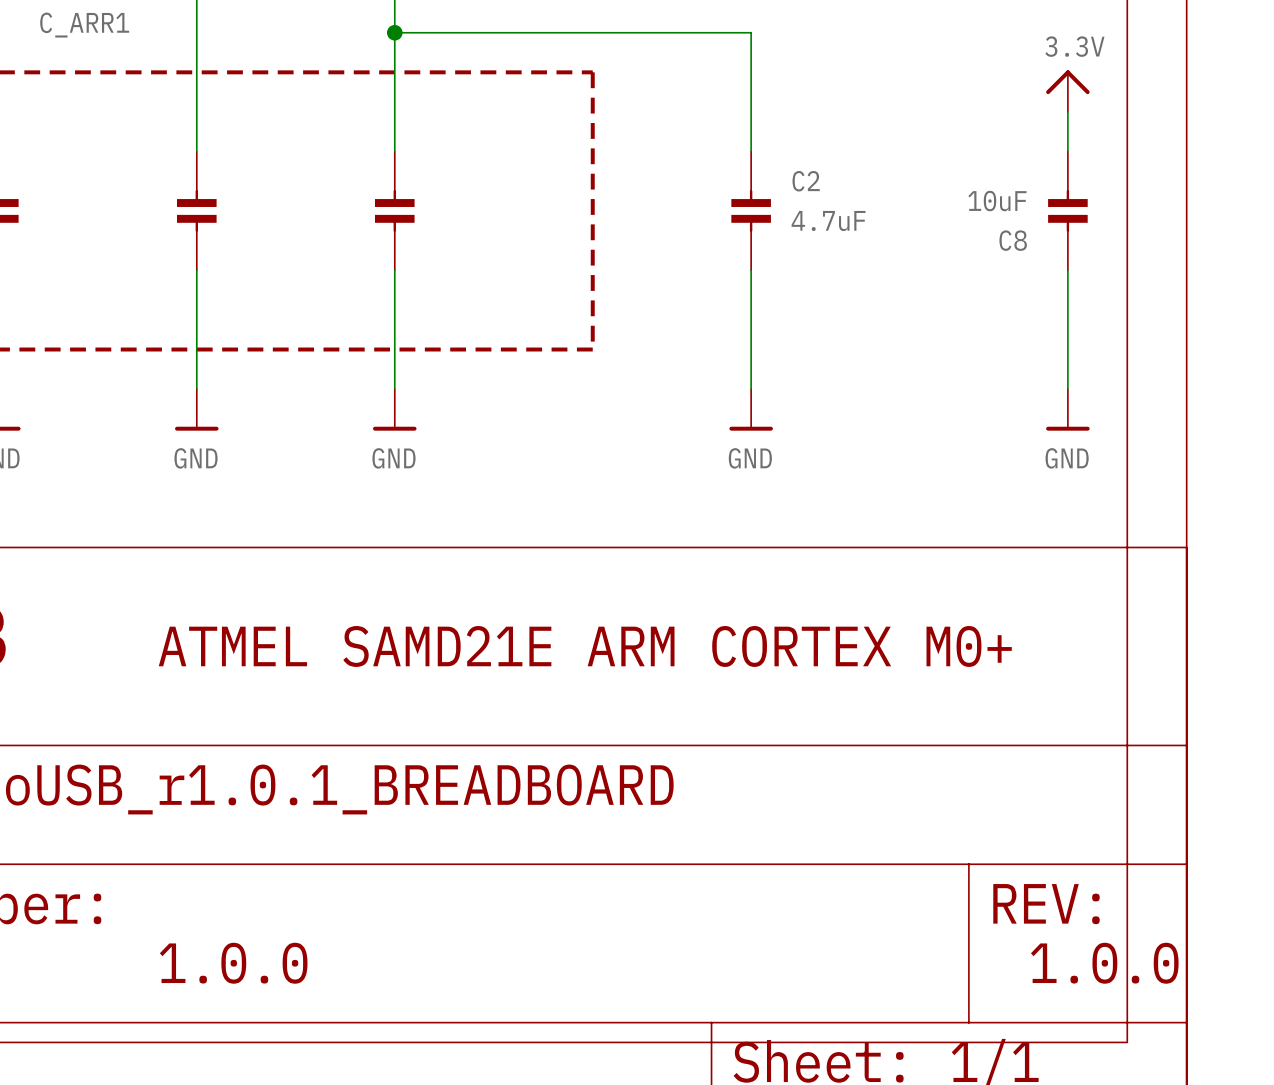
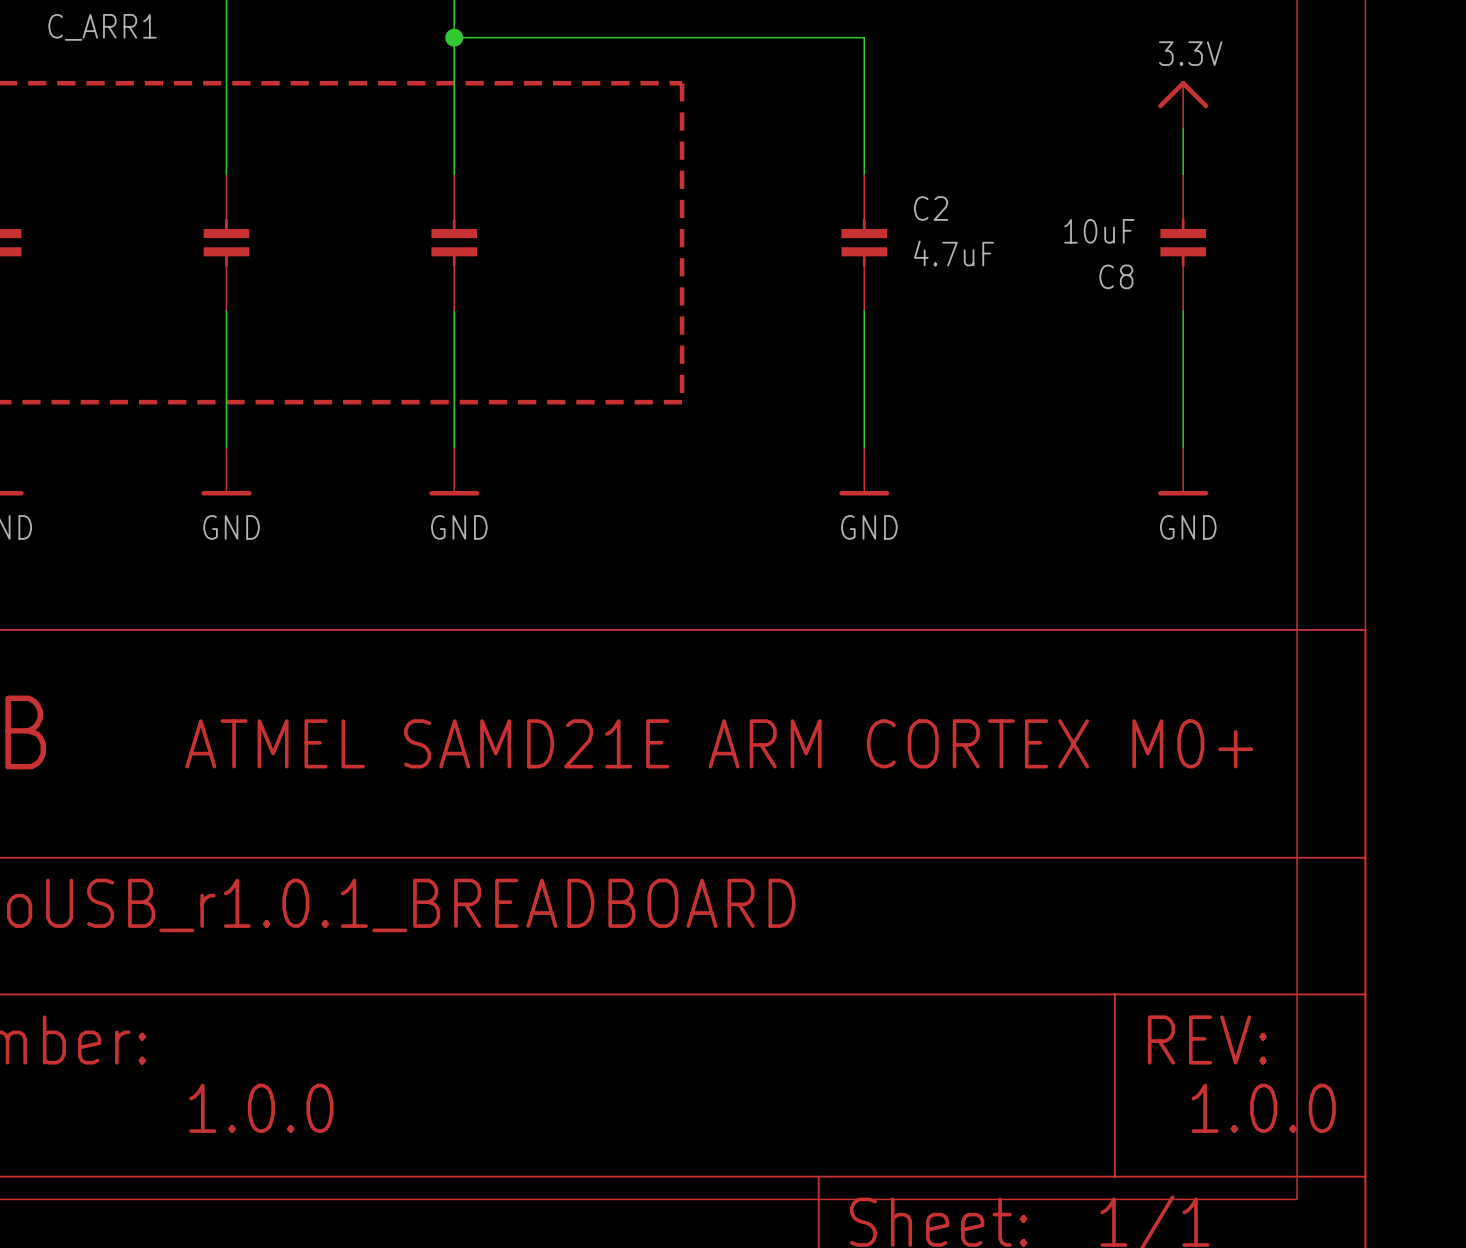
power symbol position: 3.3V (1067, 91) -> 3.3V (1183, 104)
wire: (1067, 111) (1067, 151) -> (1183, 128) (1183, 174)
C8 position: (1067, 210) -> (1183, 242)
wire: (1067, 270) (1067, 389) -> (1183, 311) (1183, 447)
power symbol position: GND (1067, 409) -> GND (1183, 471)

